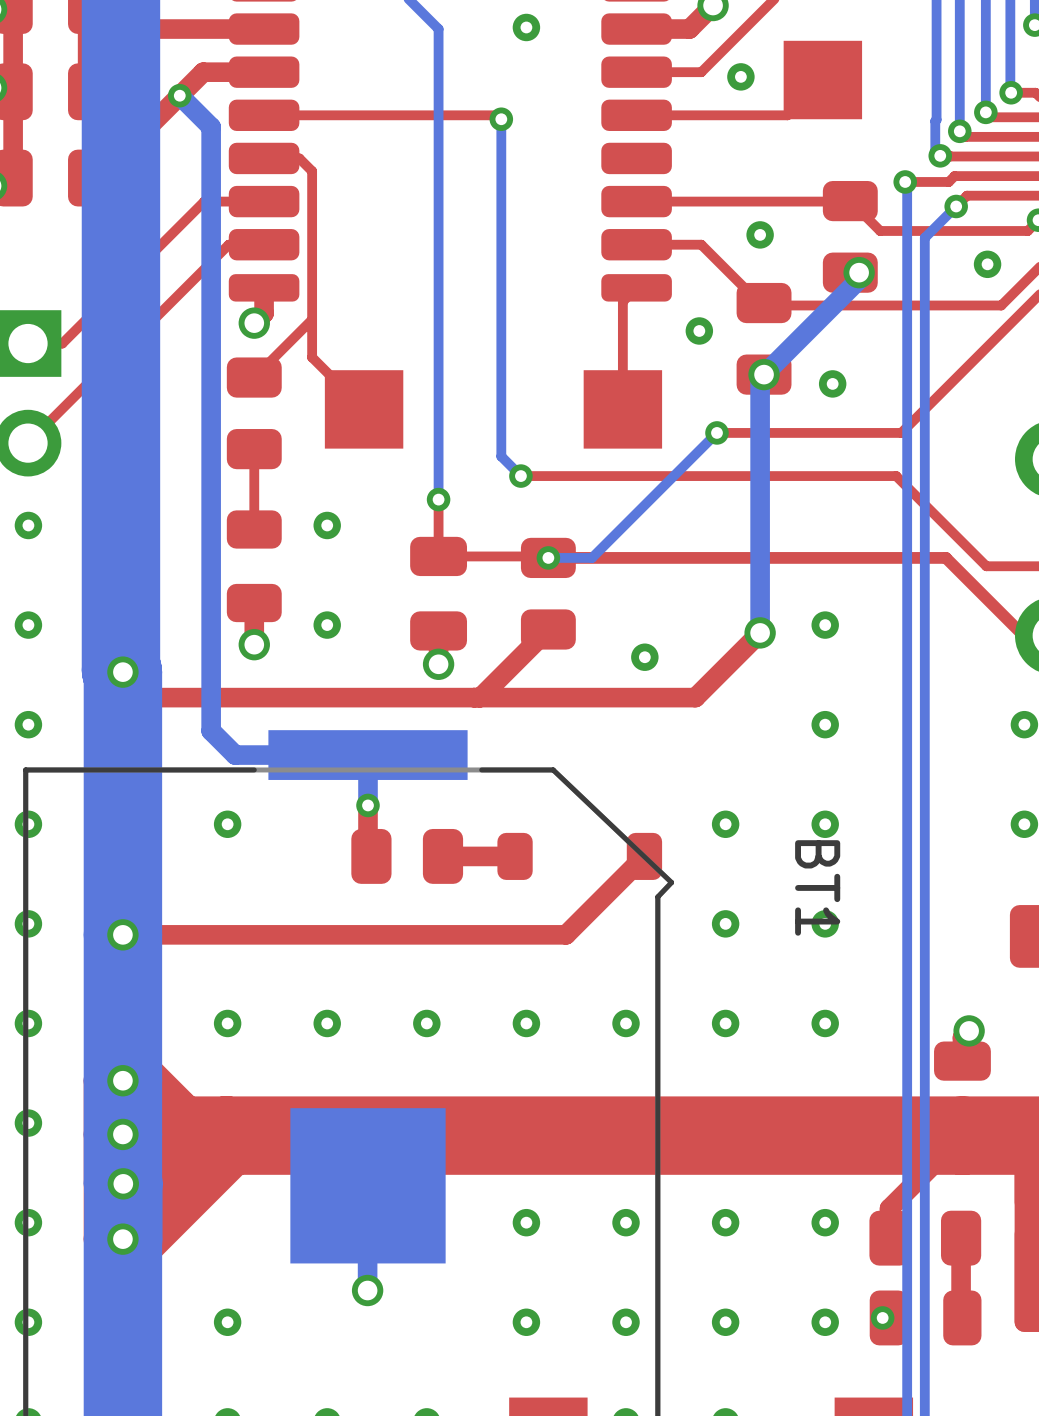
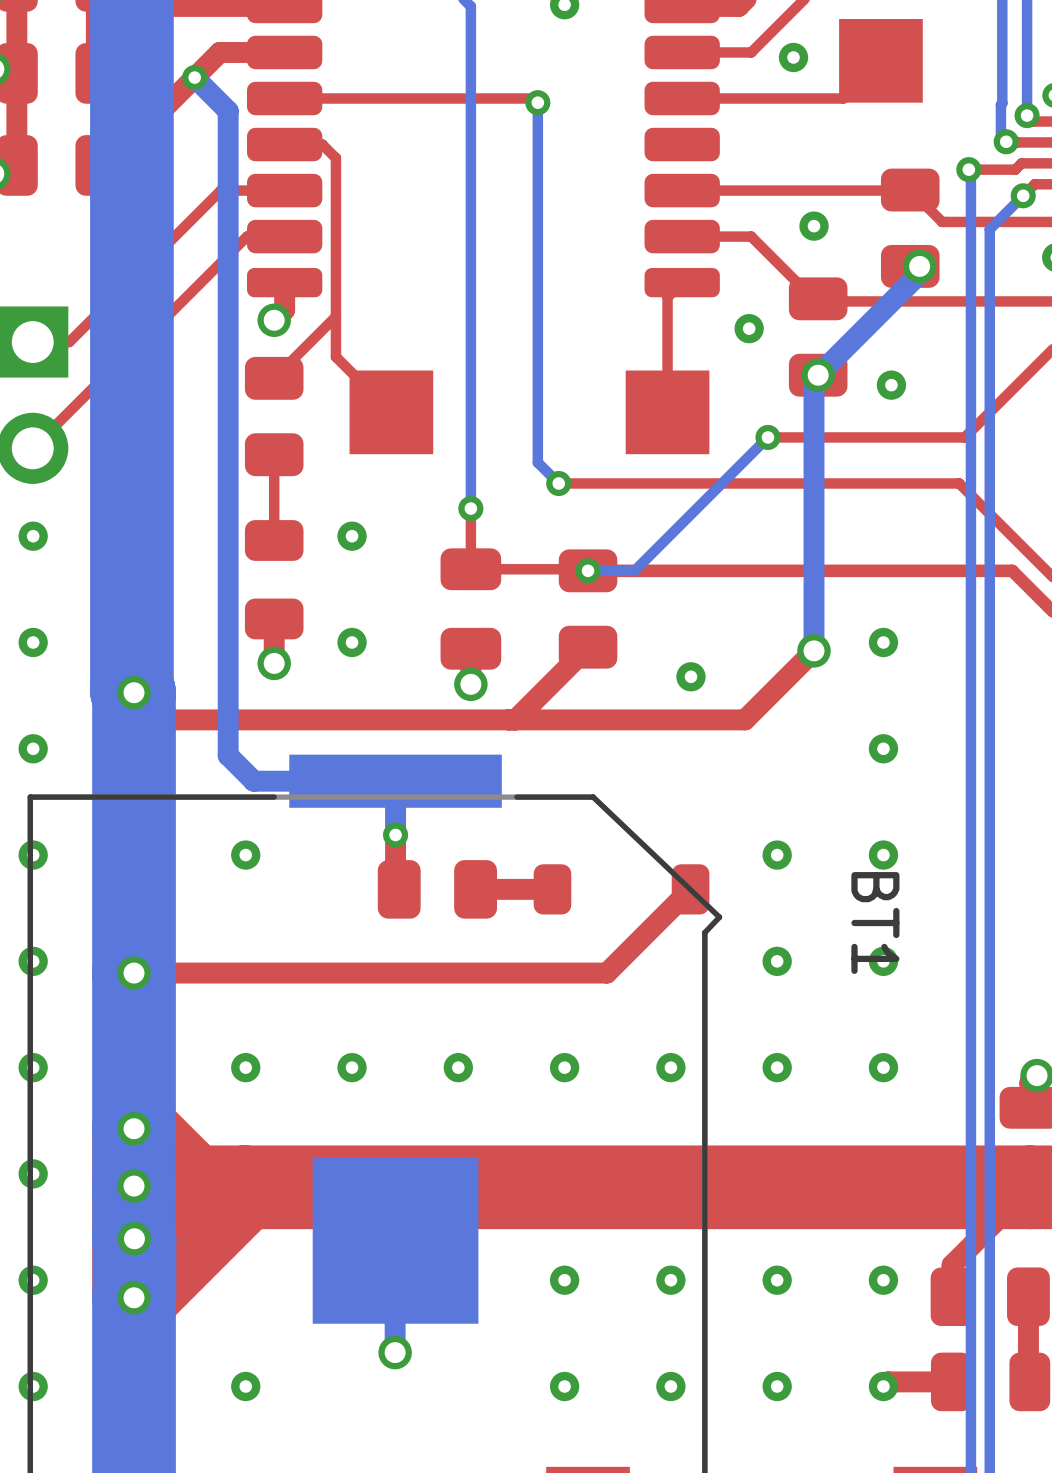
via: (882, 1317) -> none
top track: none -> (951, 1381) (888, 1381) (883, 1386)

